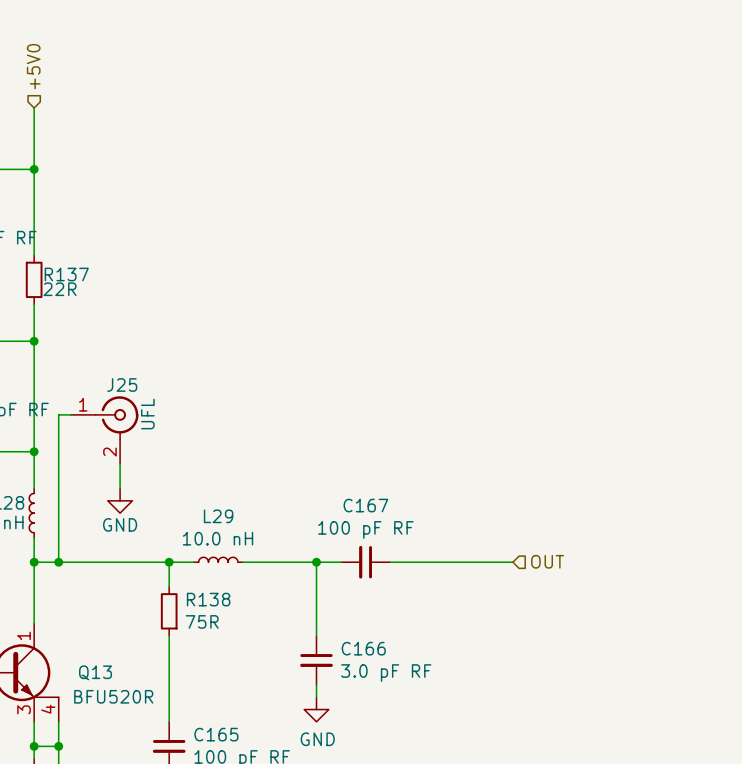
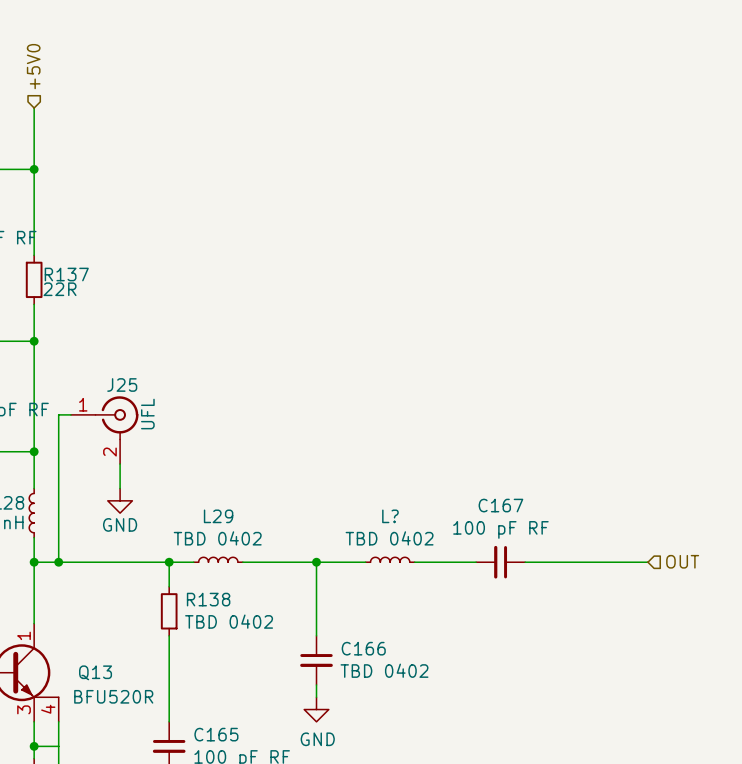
L29 value: 10.0 nH (218, 538) -> TBD 0402 (217, 538)
L?: none -> TBD 0402 (390, 559)
hierarchical label position: OUT (547, 561) -> OUT (682, 561)
C167 position: (365, 562) -> (500, 562)
wire: none -> (525, 562) (647, 562)
R138 value: 75R (202, 621) -> TBD 0402 (229, 621)
C166 value: 3.0 pF RF (386, 673) -> TBD 0402 (384, 670)
junction: (58, 746) -> none

